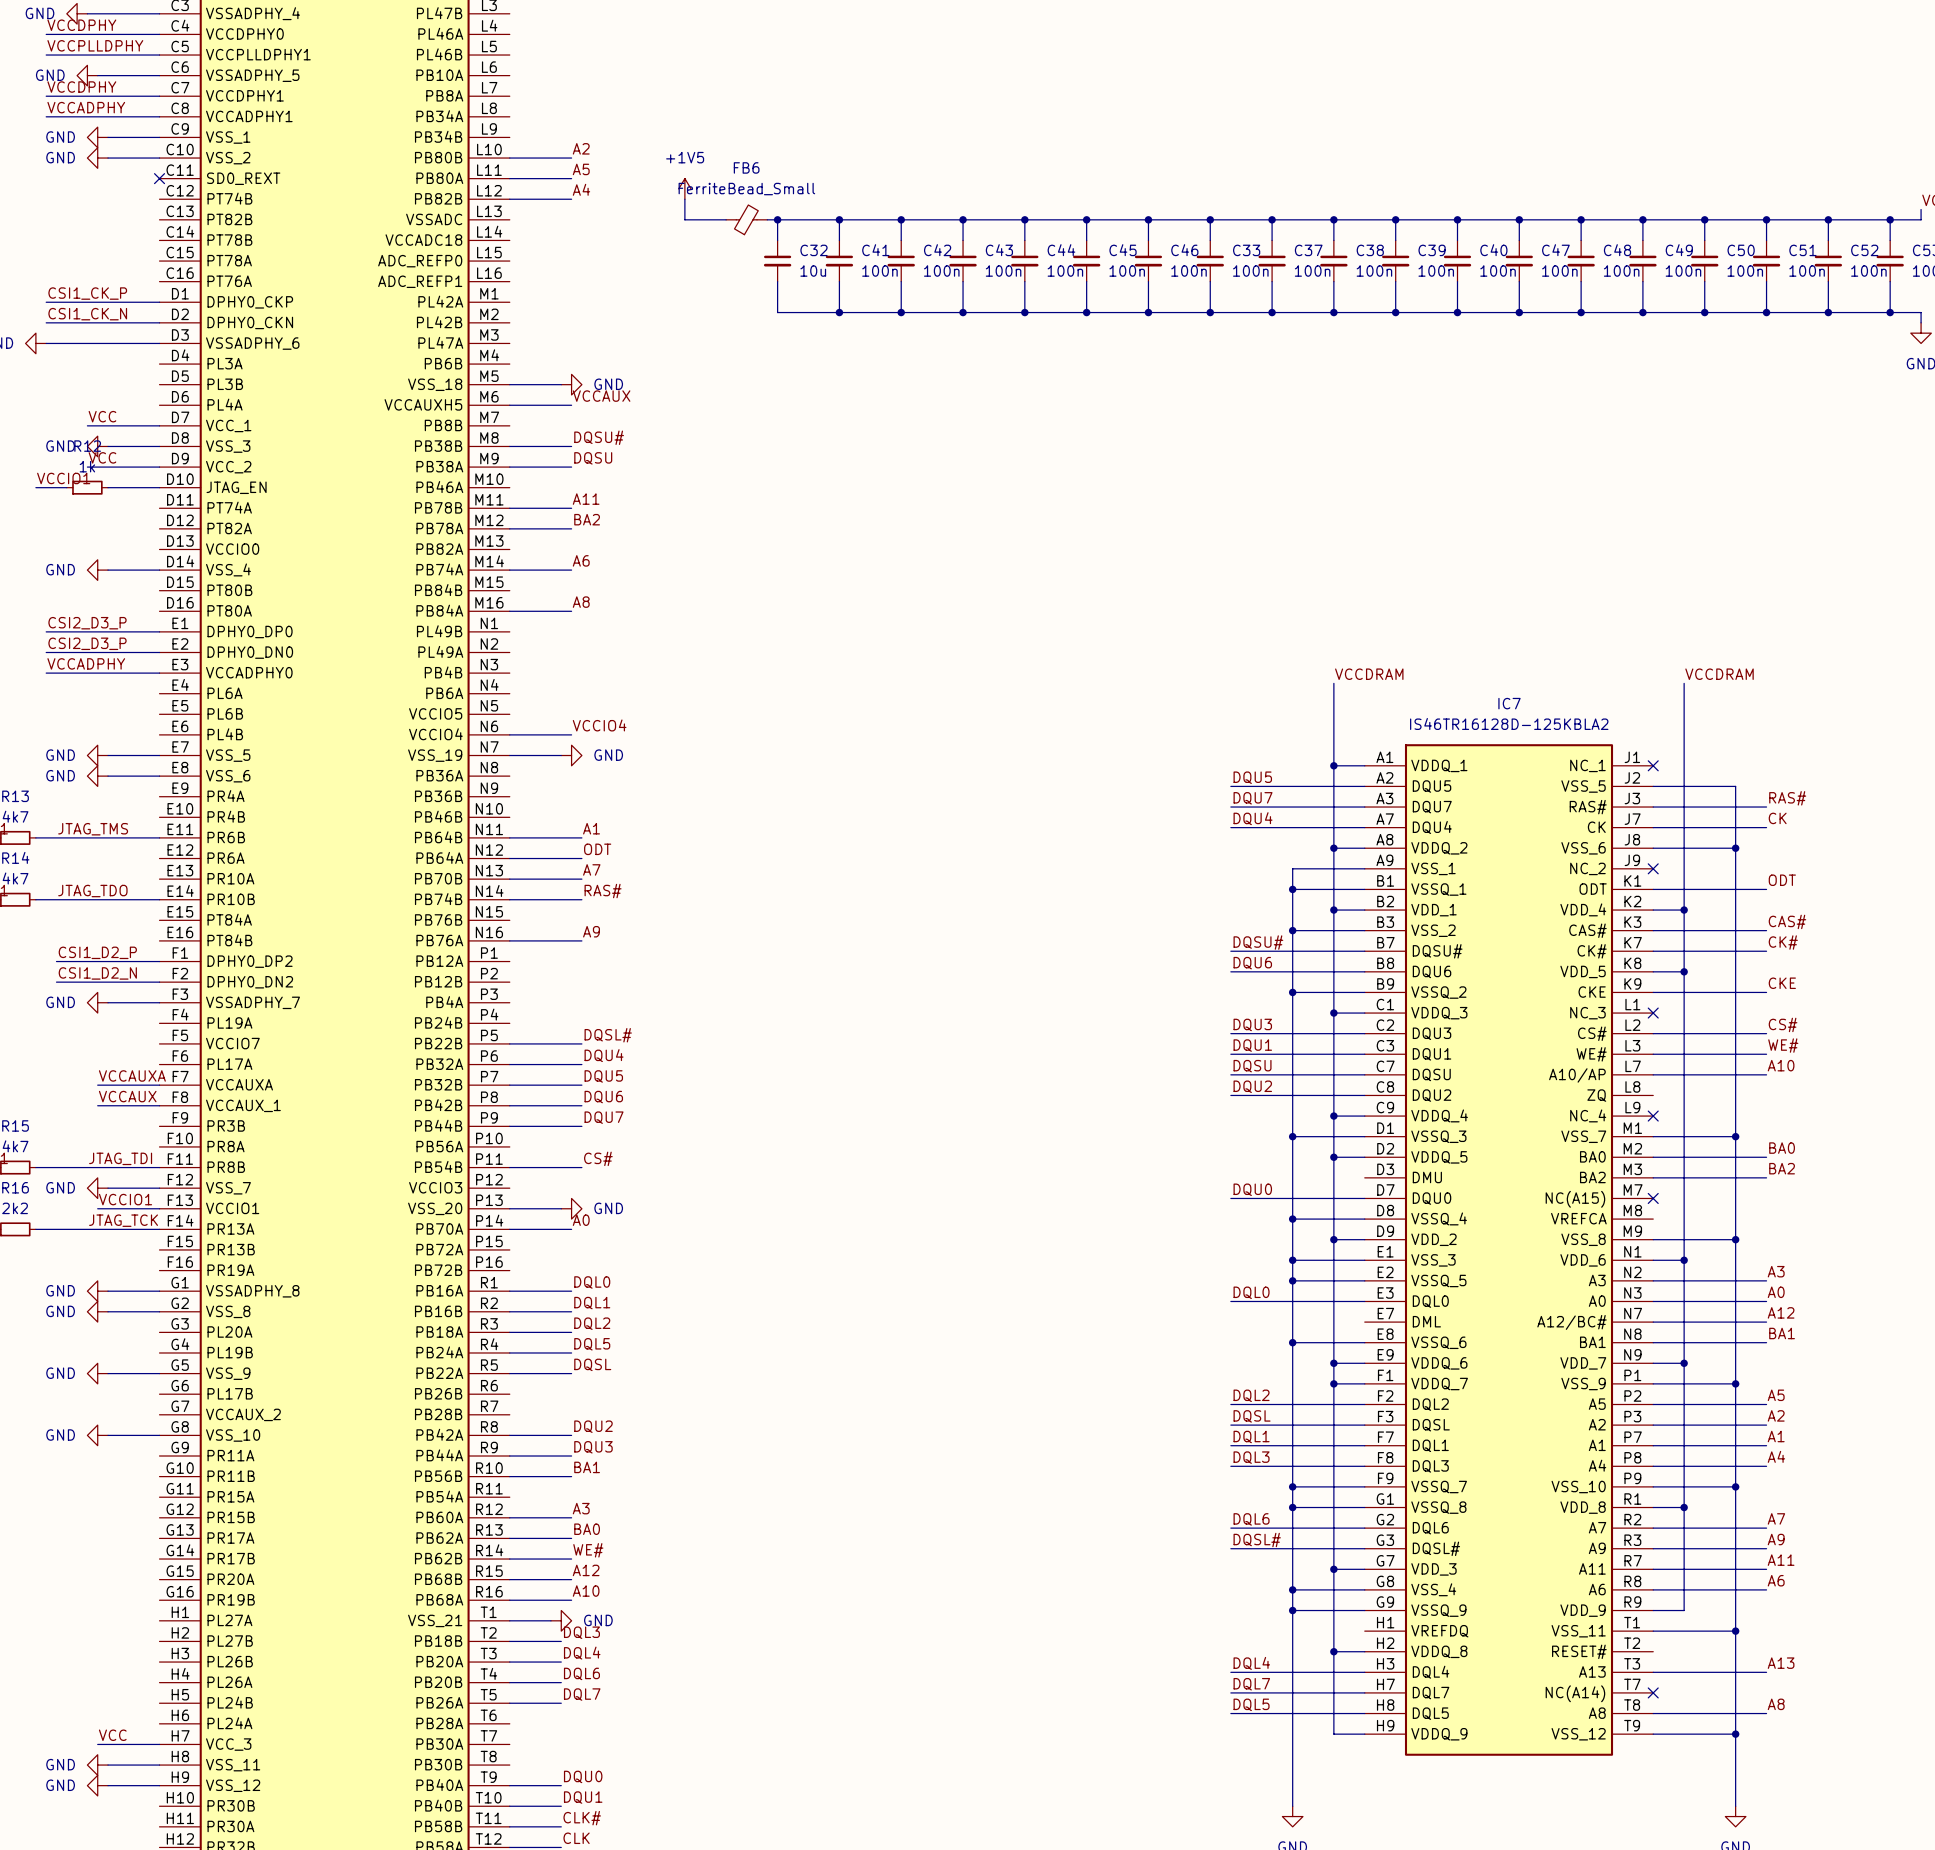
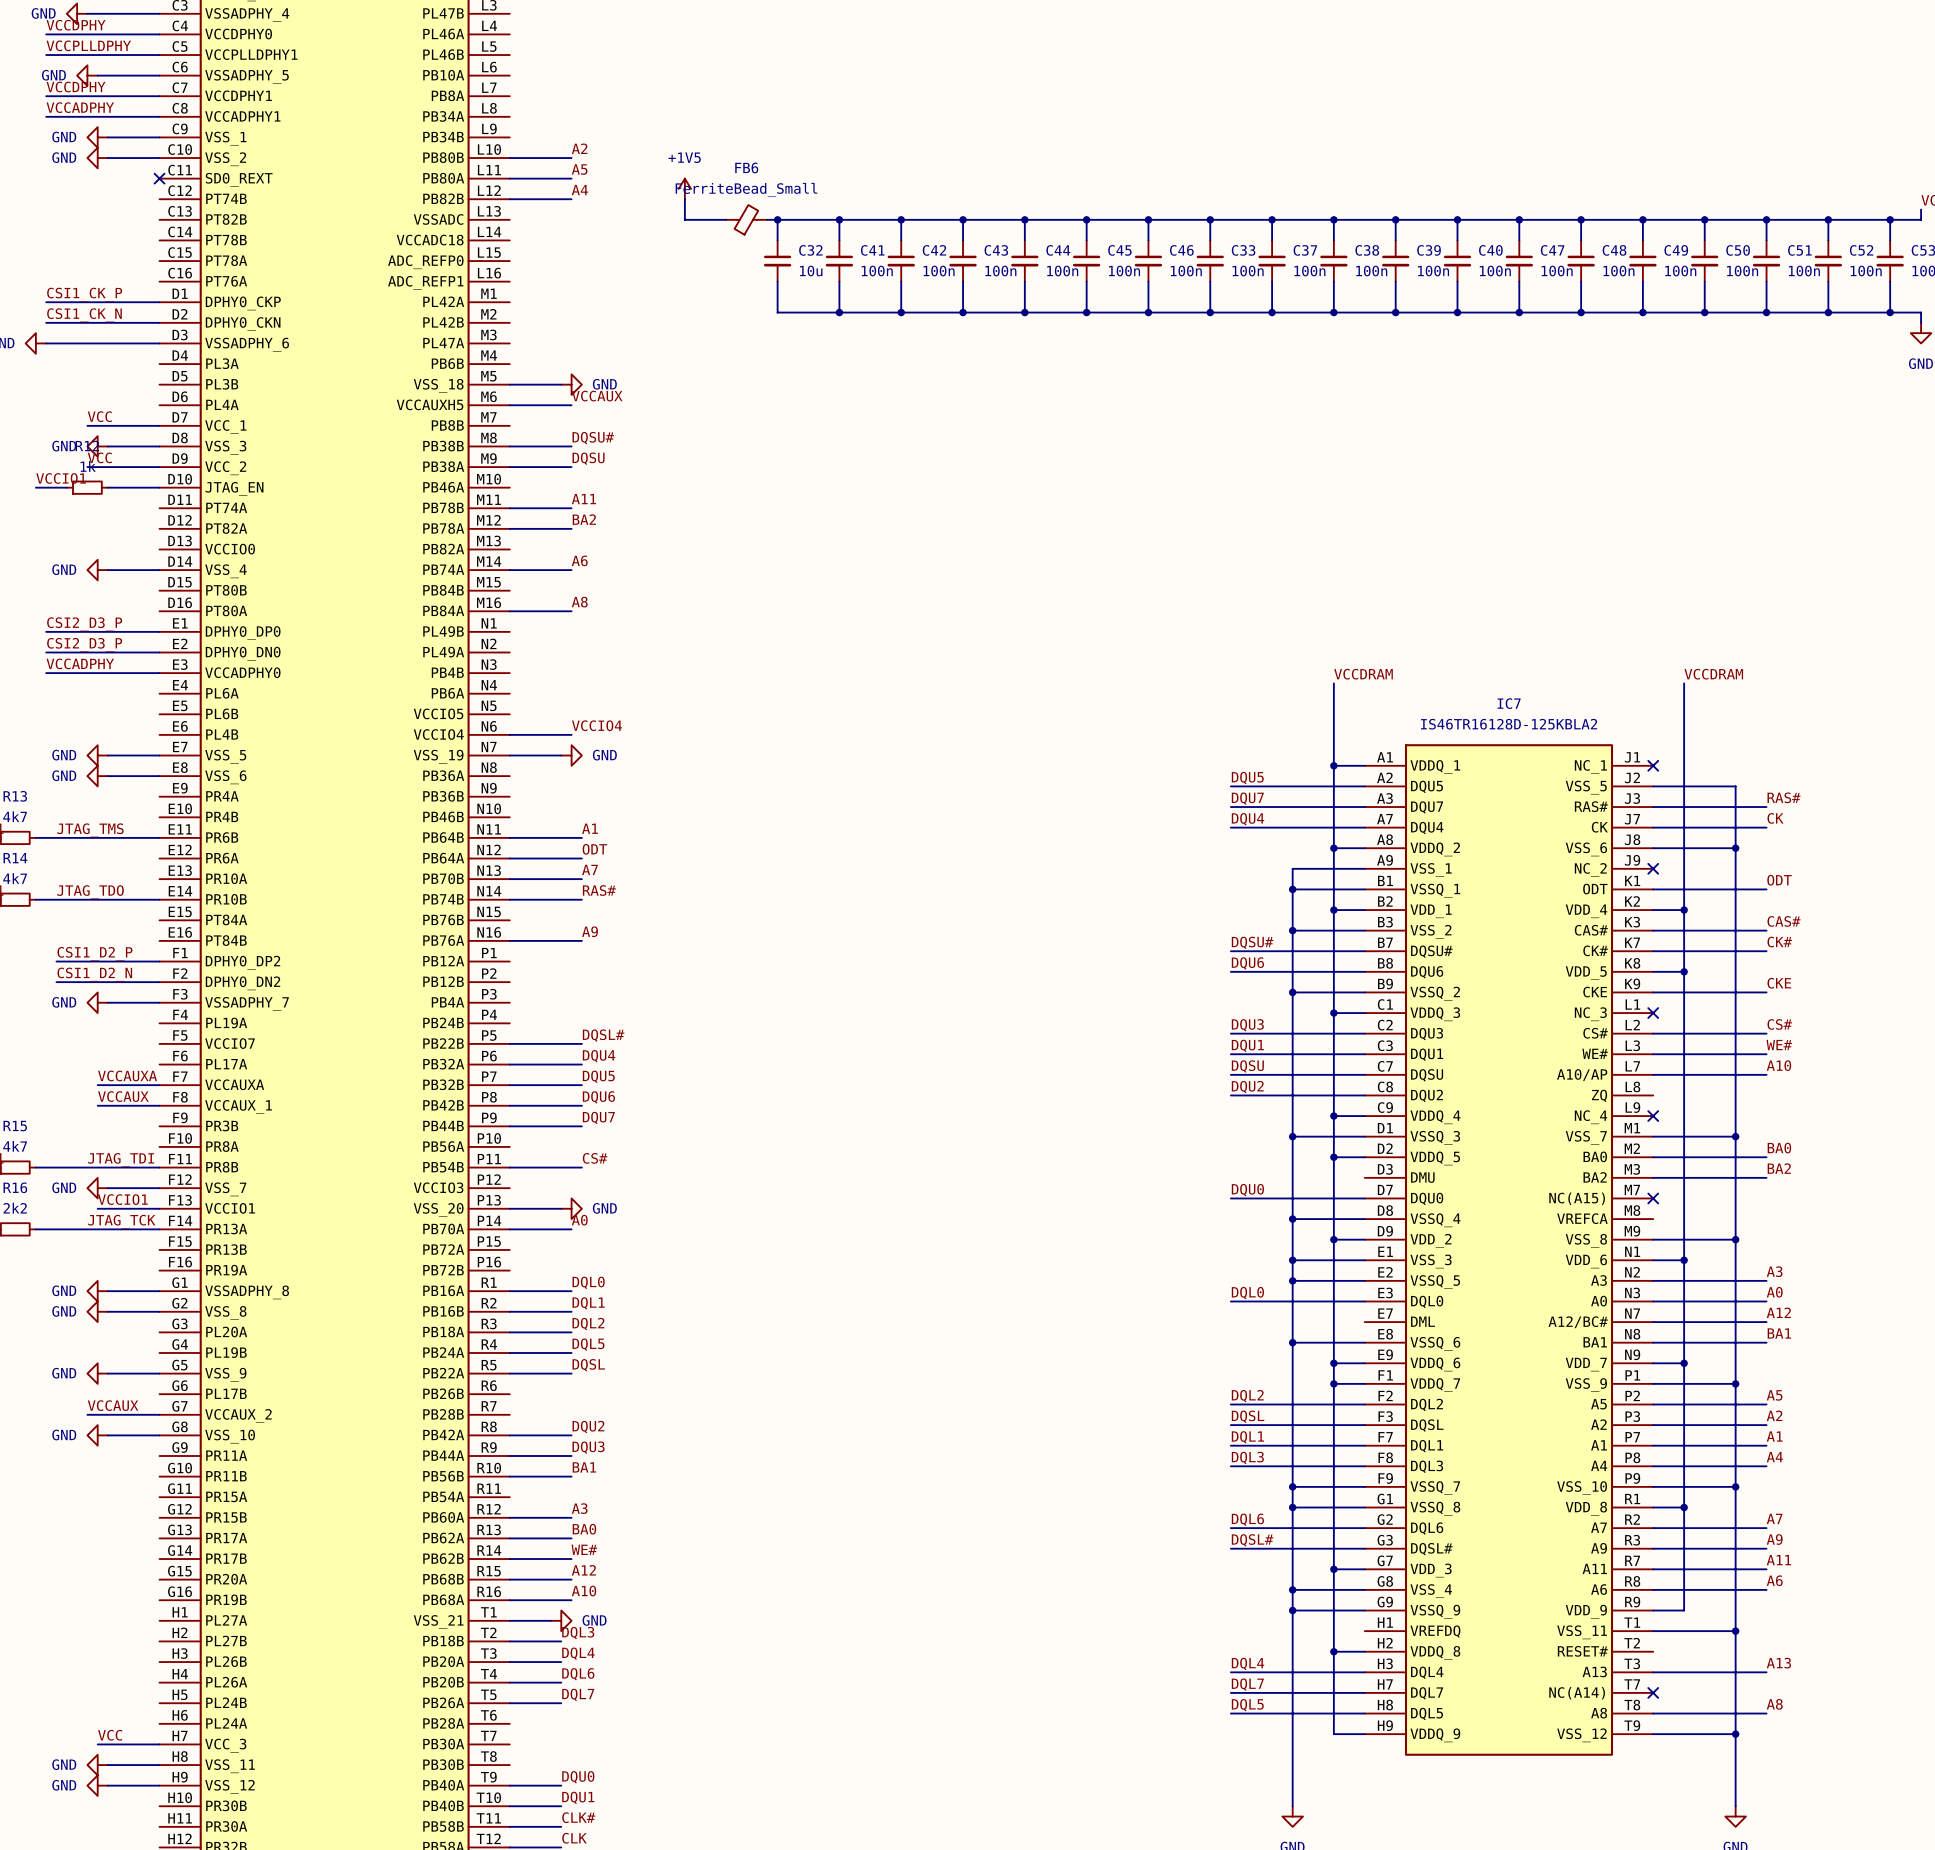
label: none -> VCCAUX (113, 1405)
wire: none -> (87, 1414) (159, 1414)

